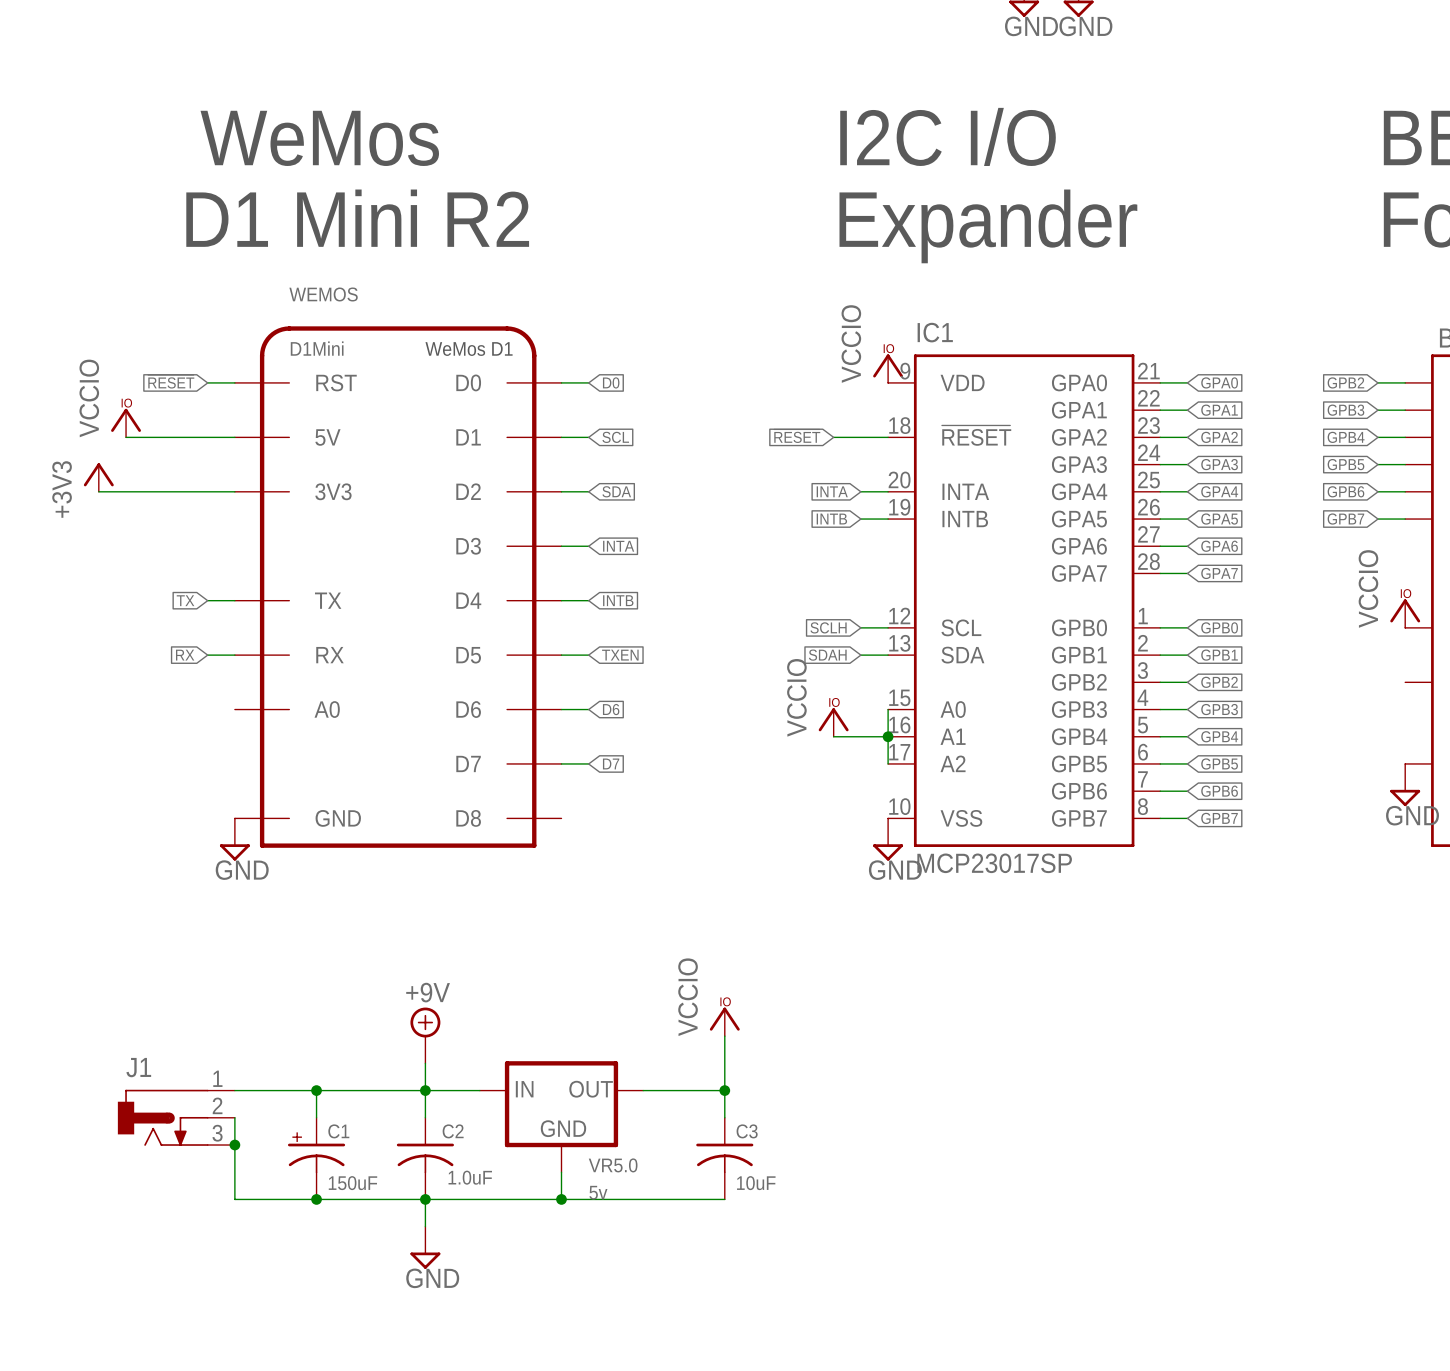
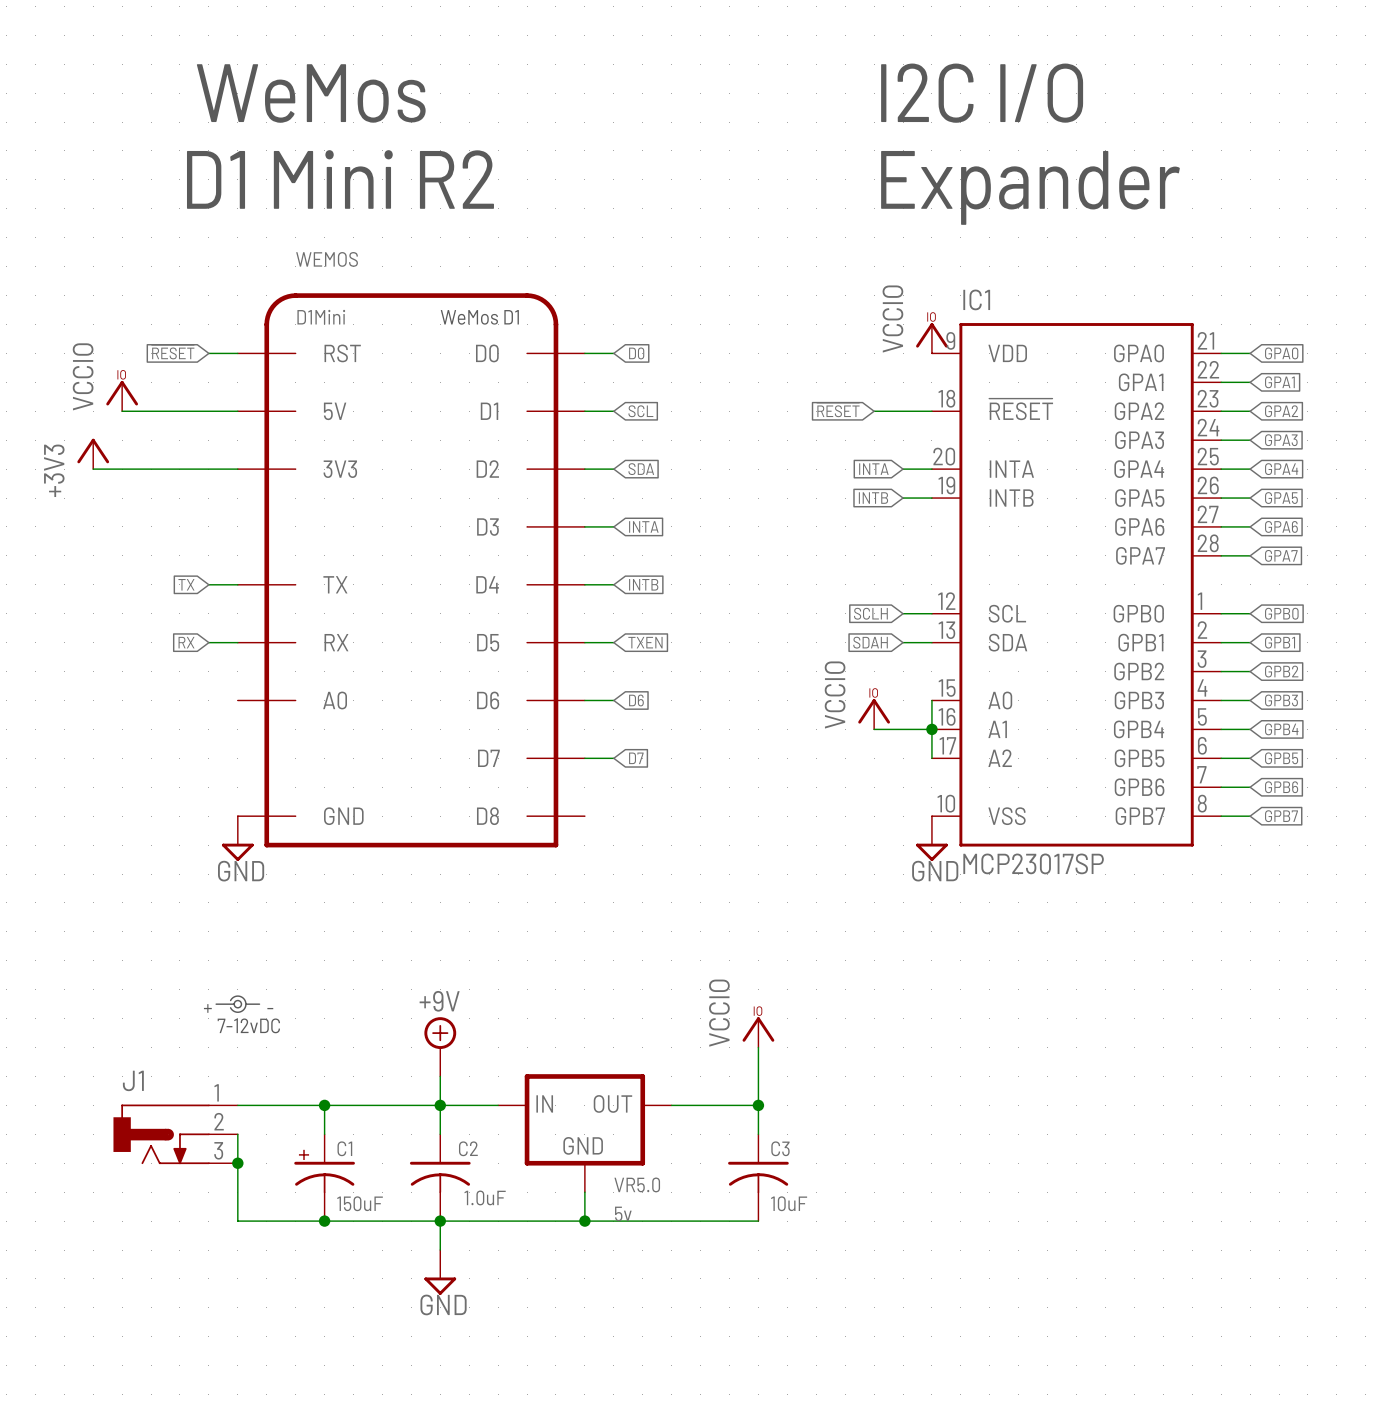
part: none -> 7-12vDC (237, 1004)

